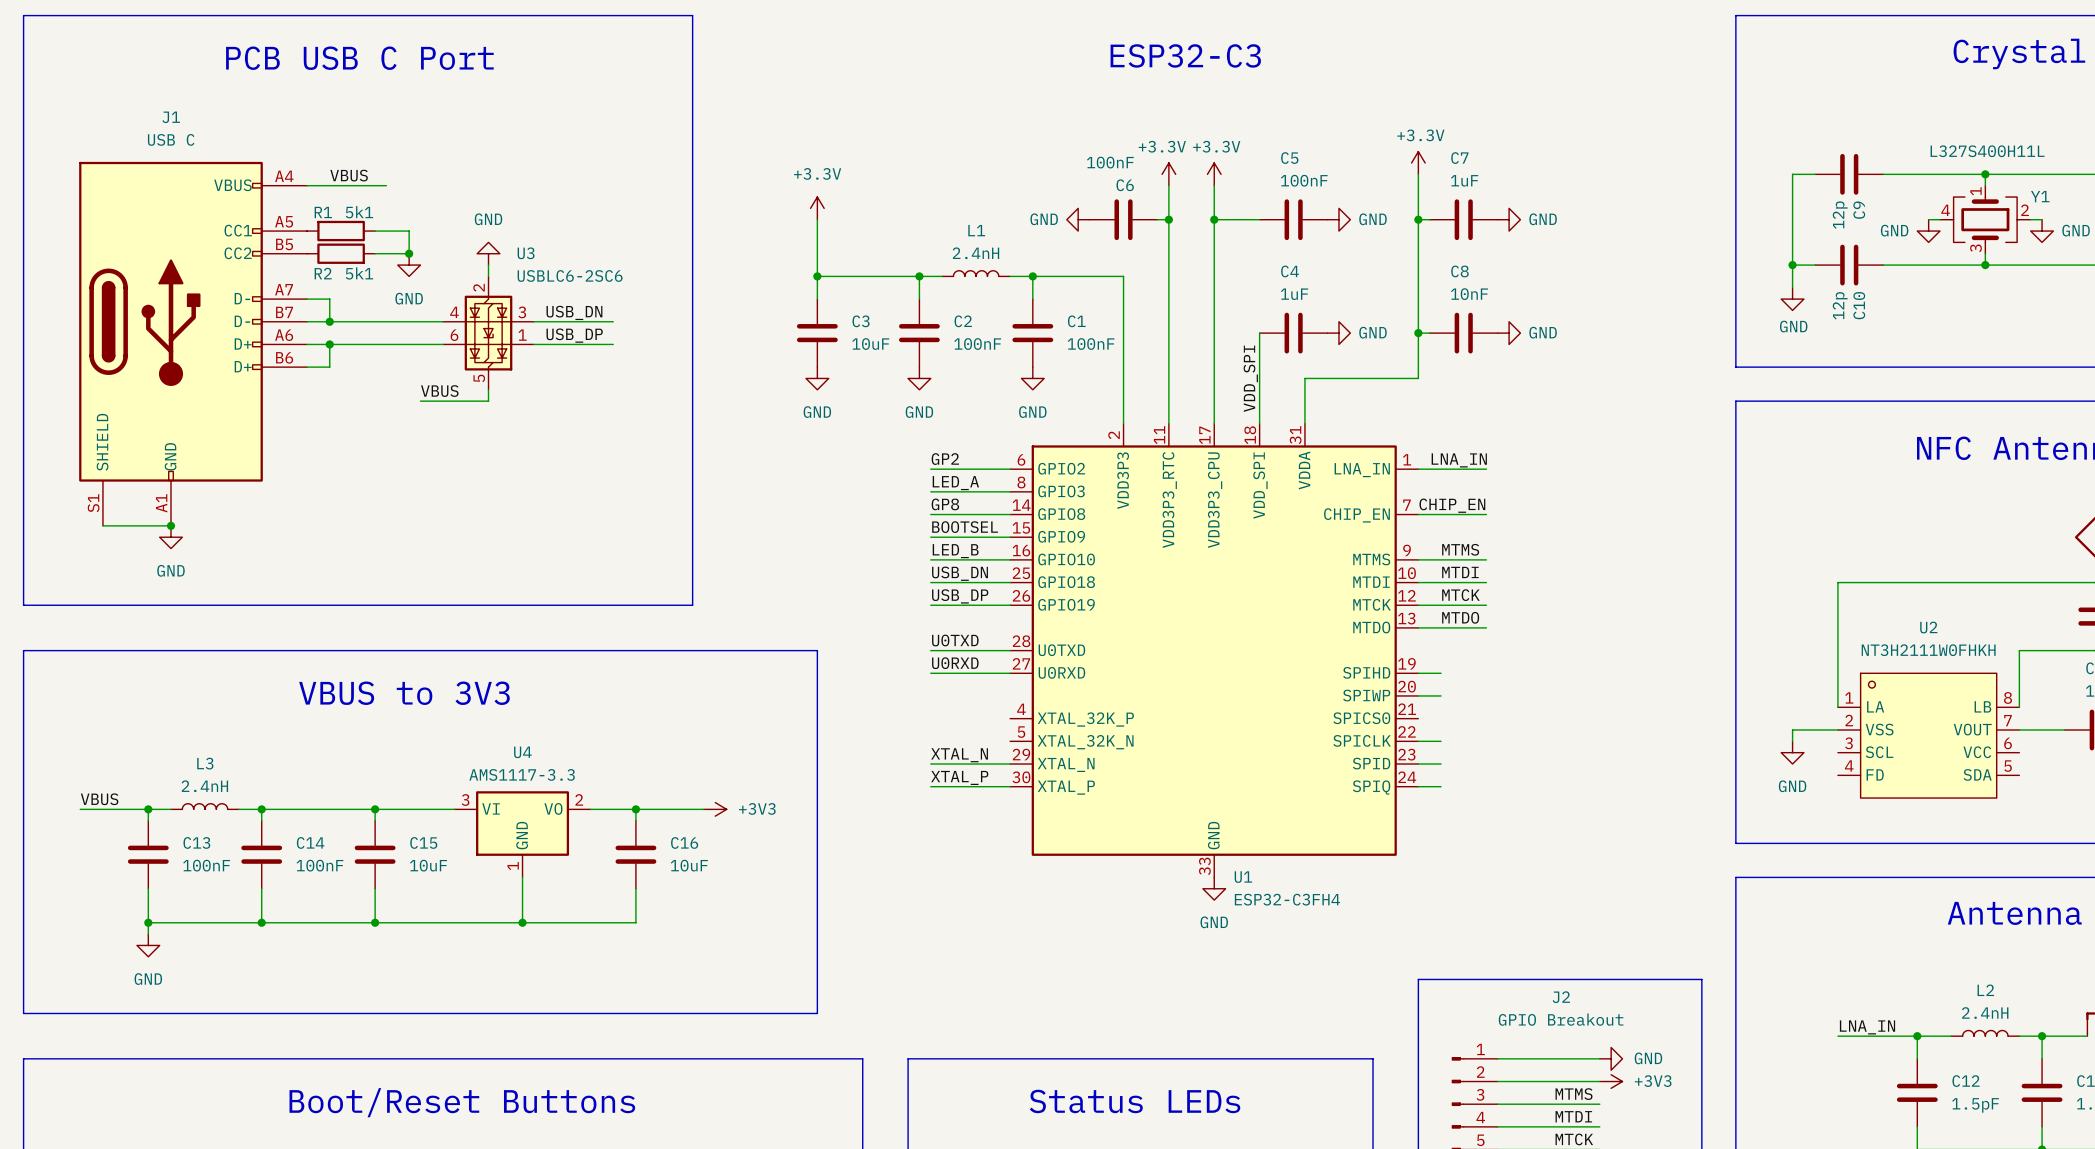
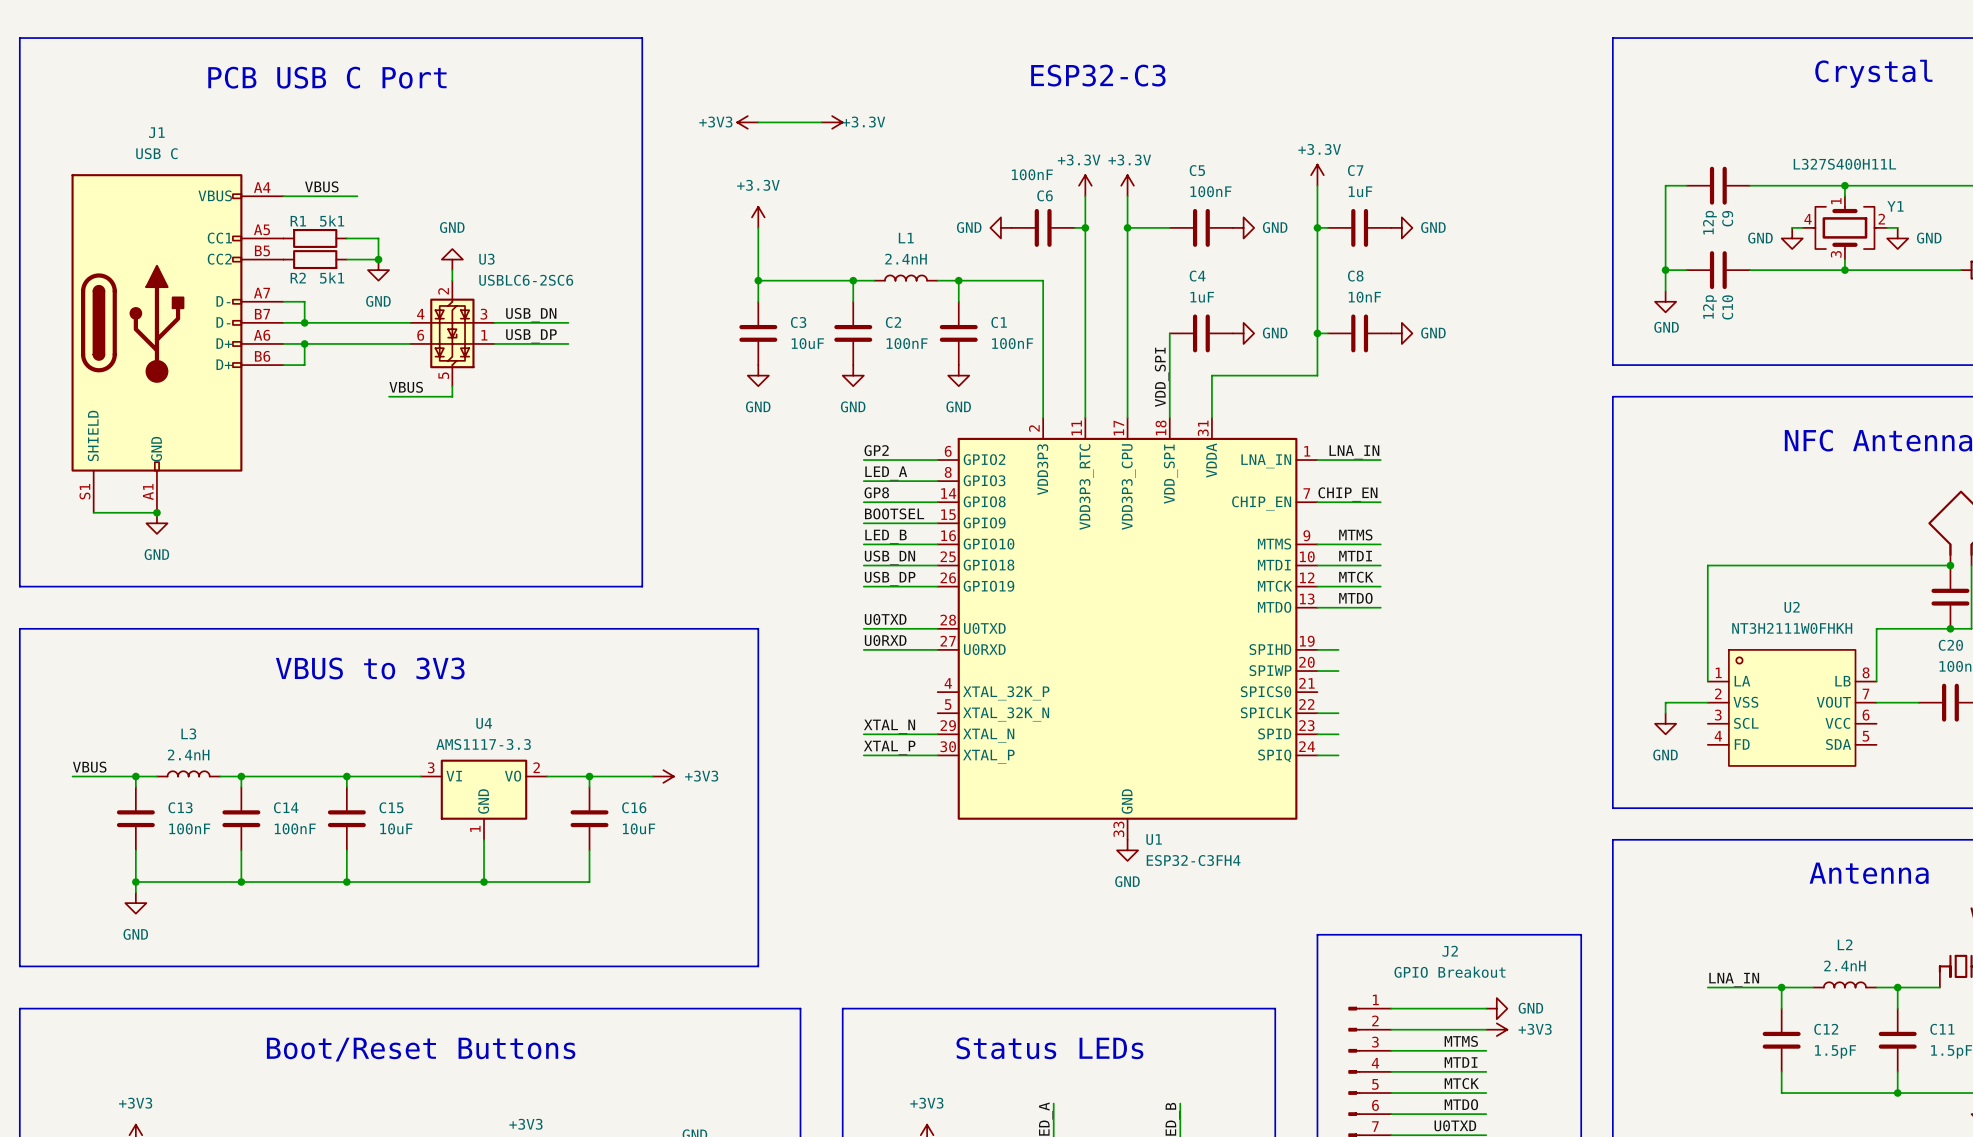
power symbol: none -> +3V3 (747, 122)
wire: none -> (758, 122) (821, 122)
power symbol: none -> +3.3V (832, 122)

